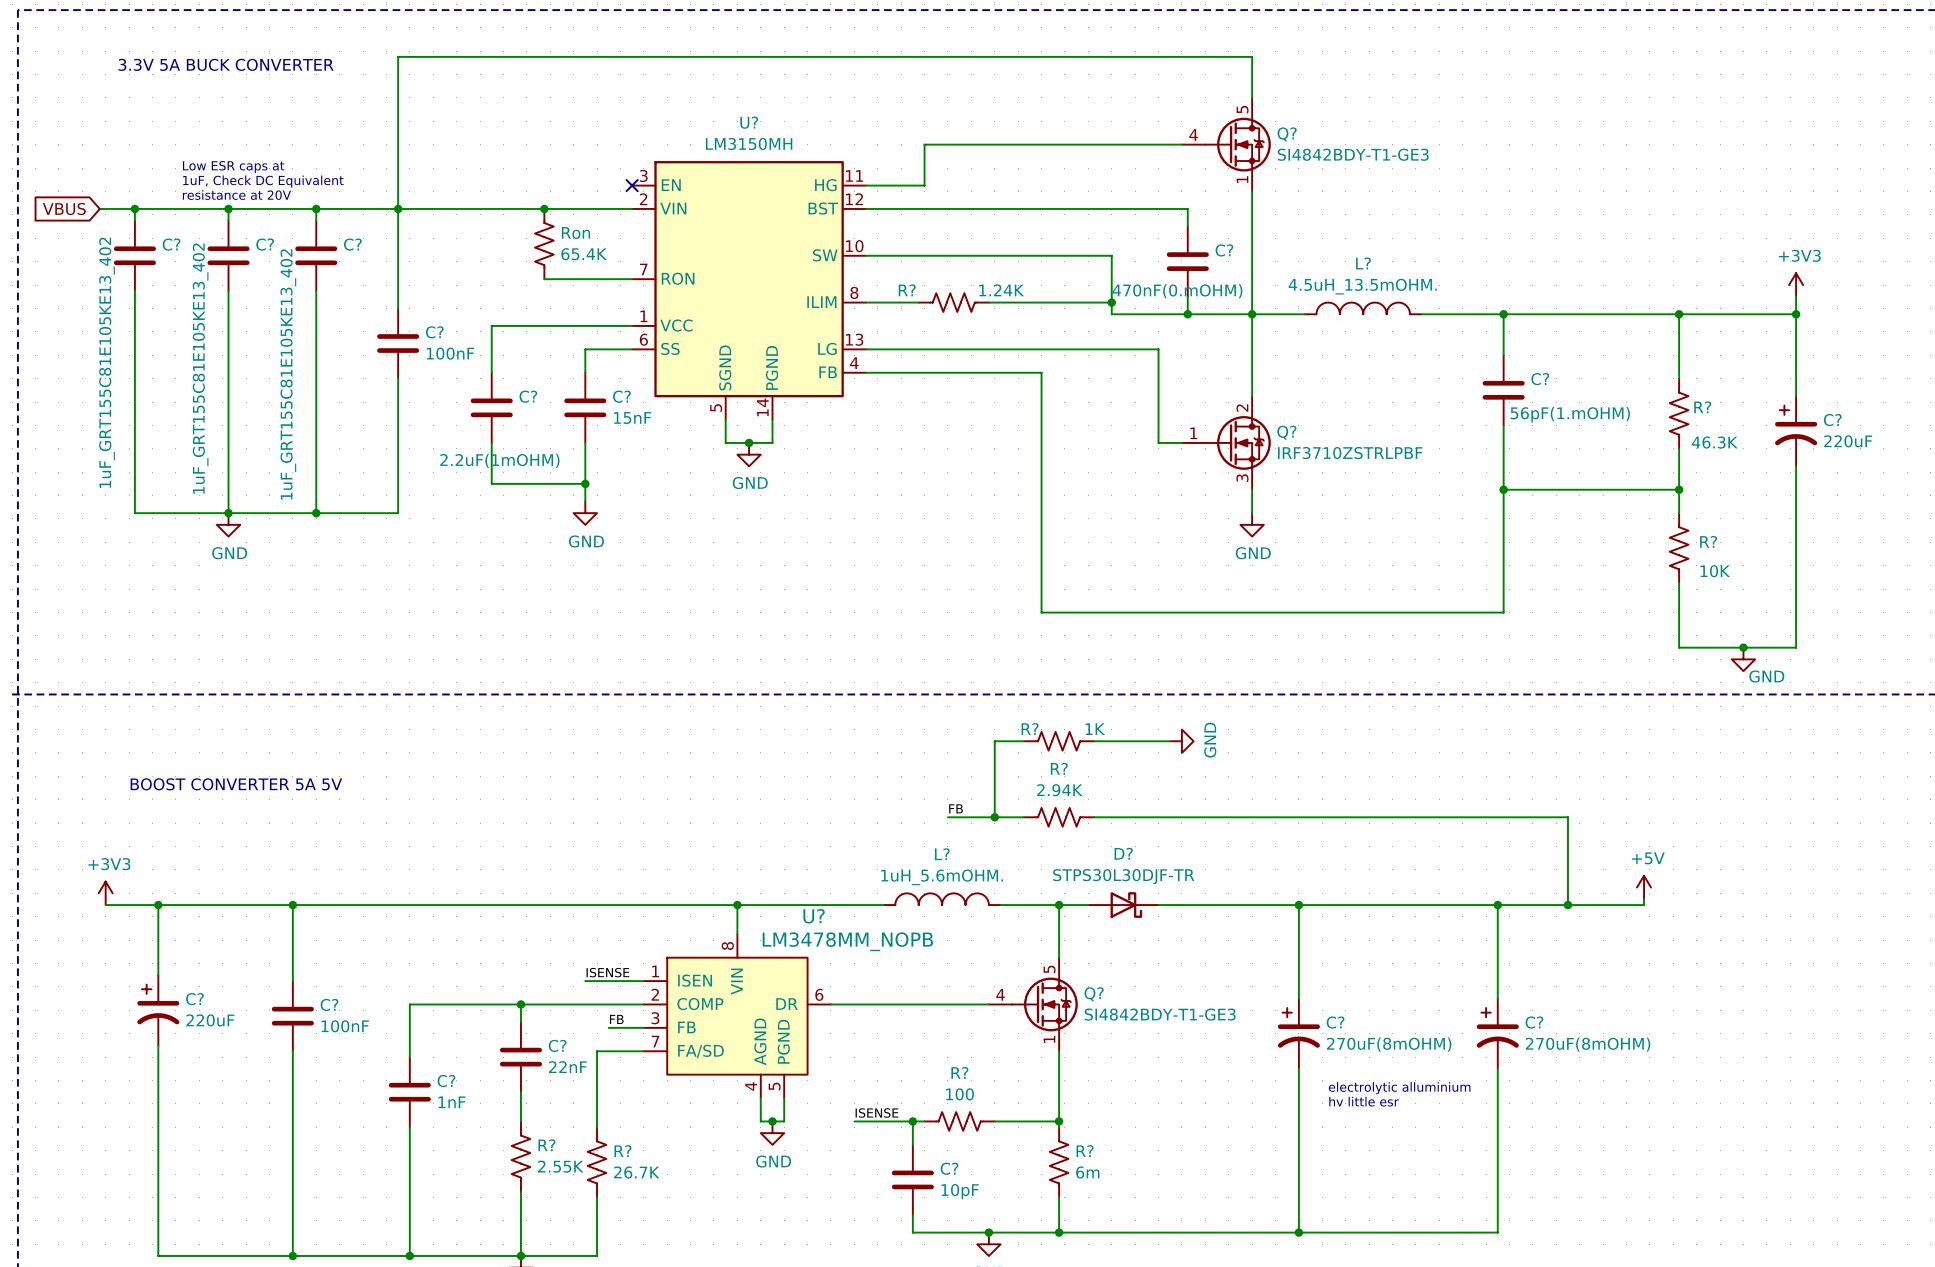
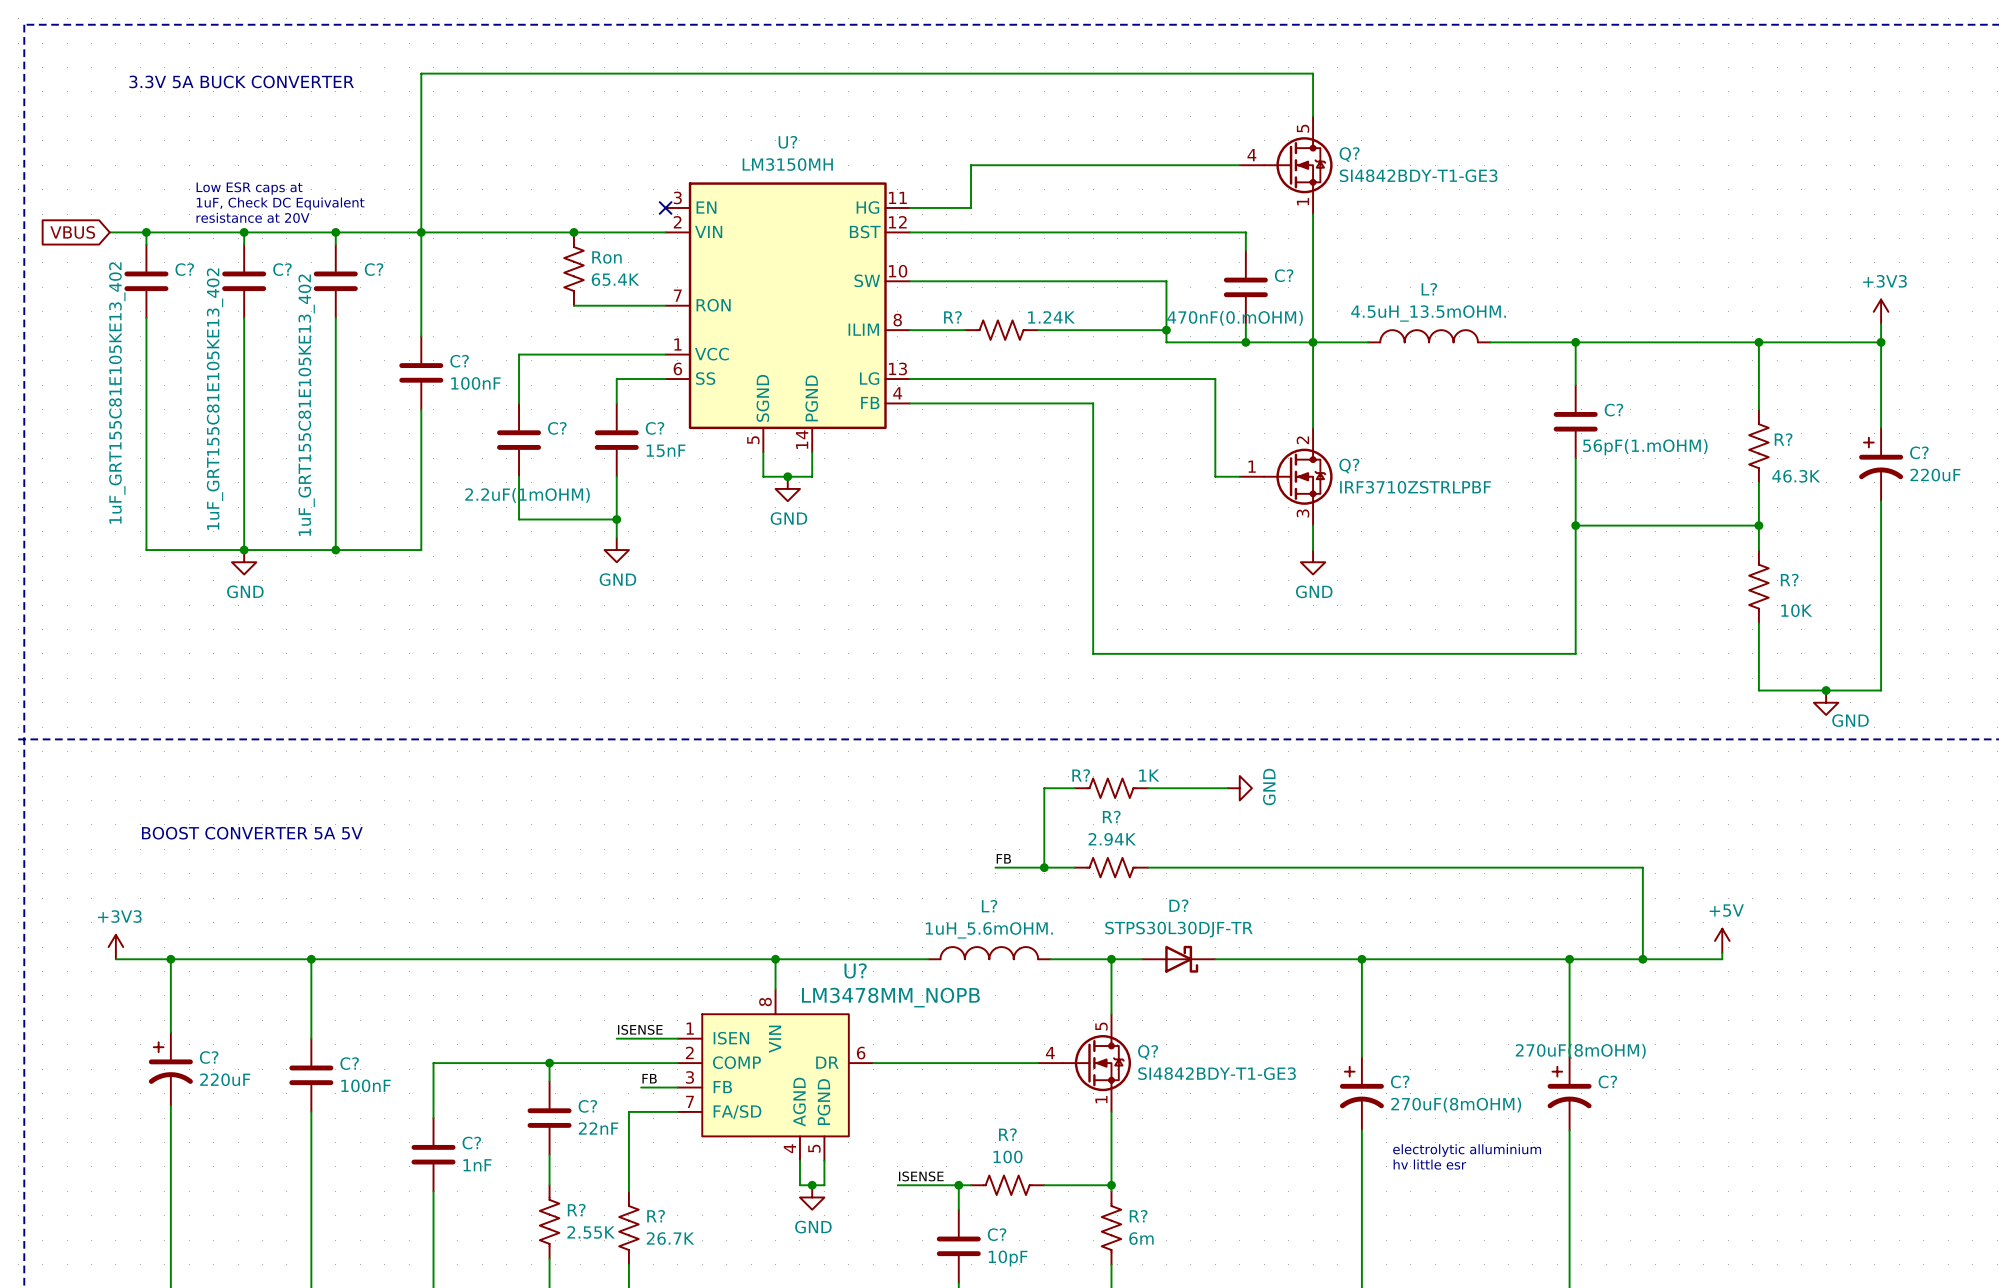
C? value position: 270uF(8mOHM) (1588, 1044) -> 270uF(8mOHM) (1580, 1051)

